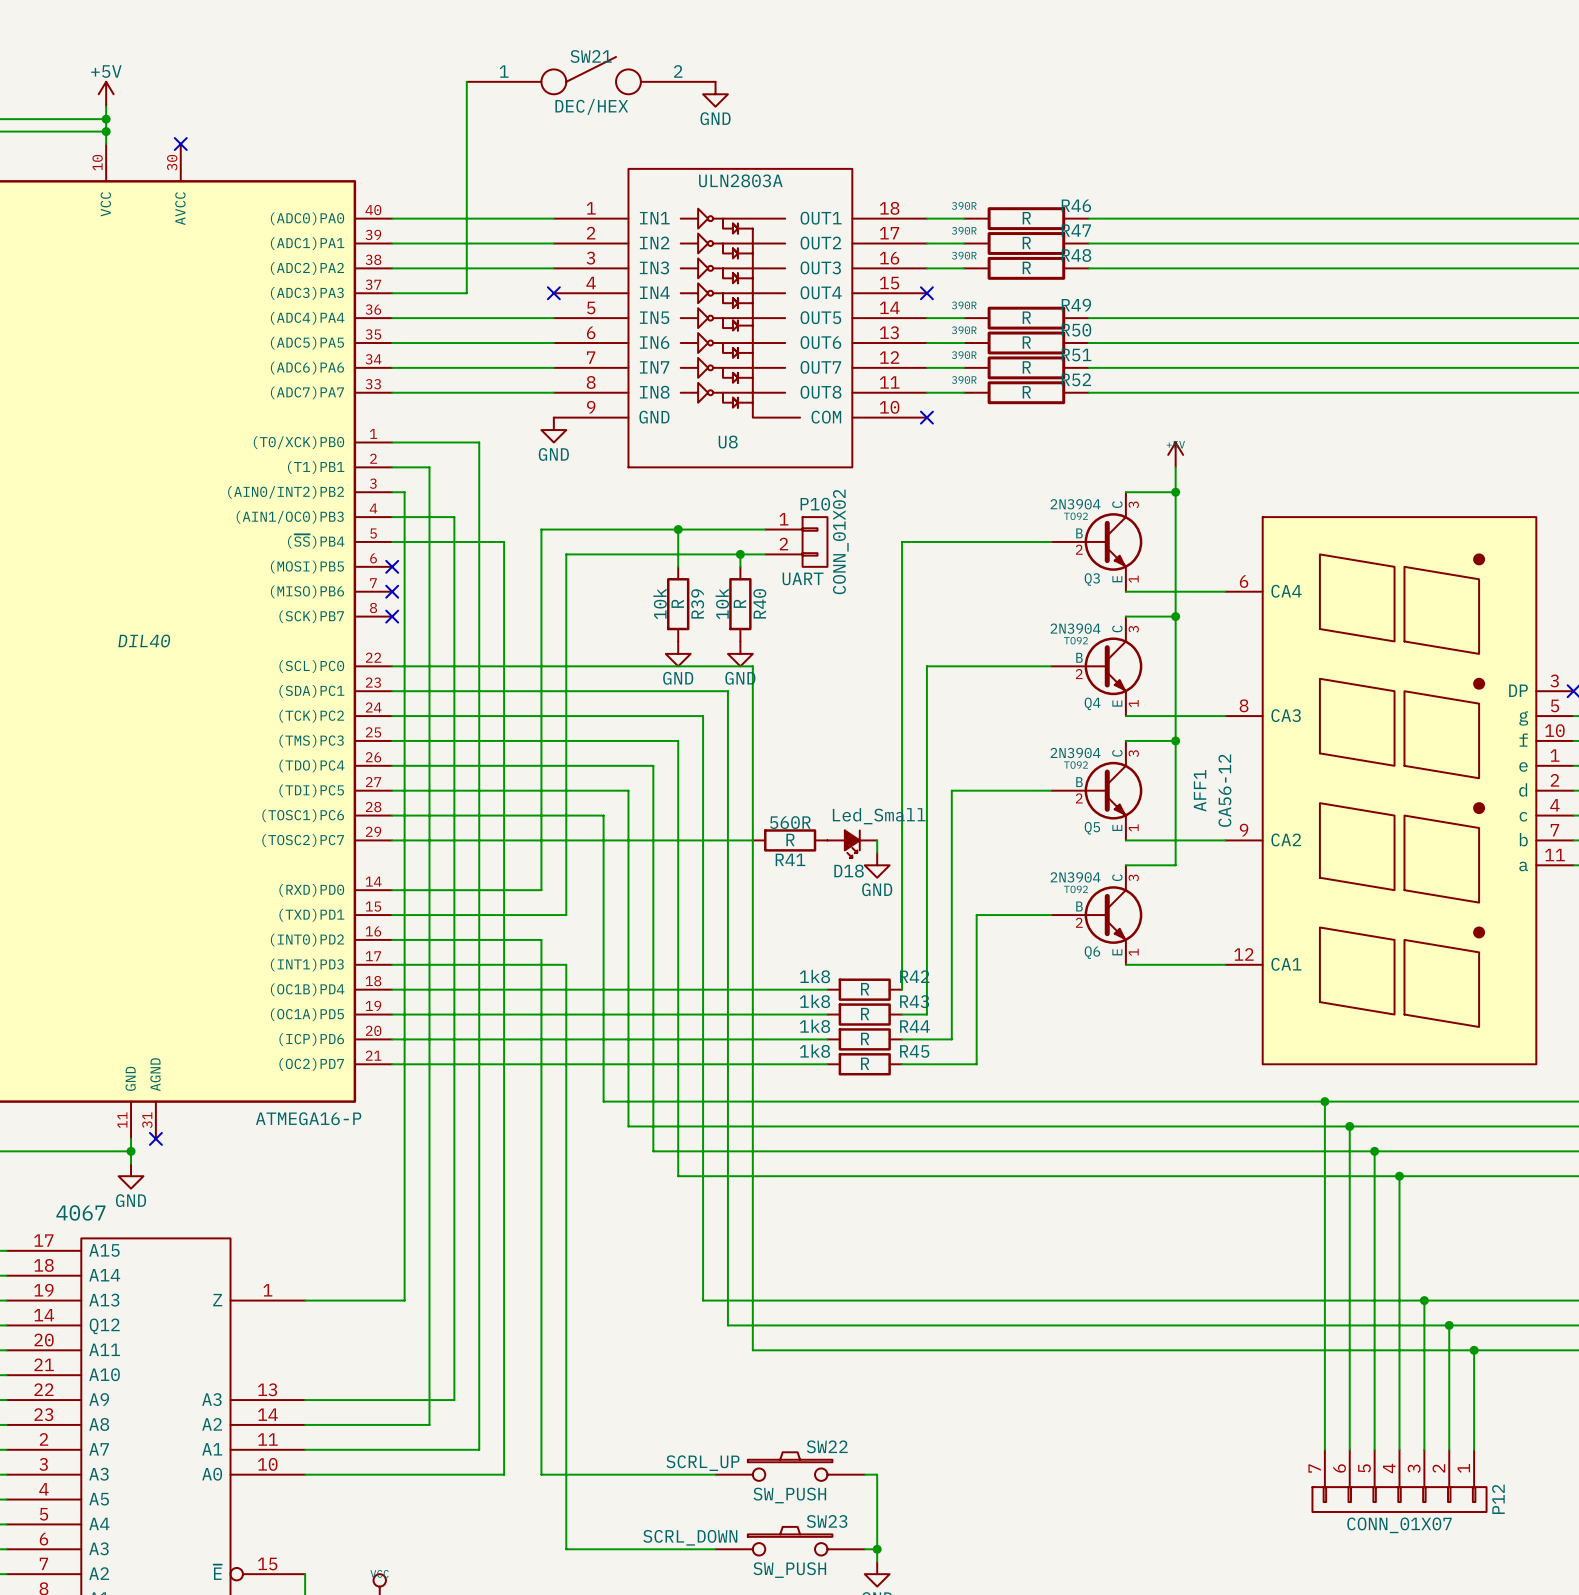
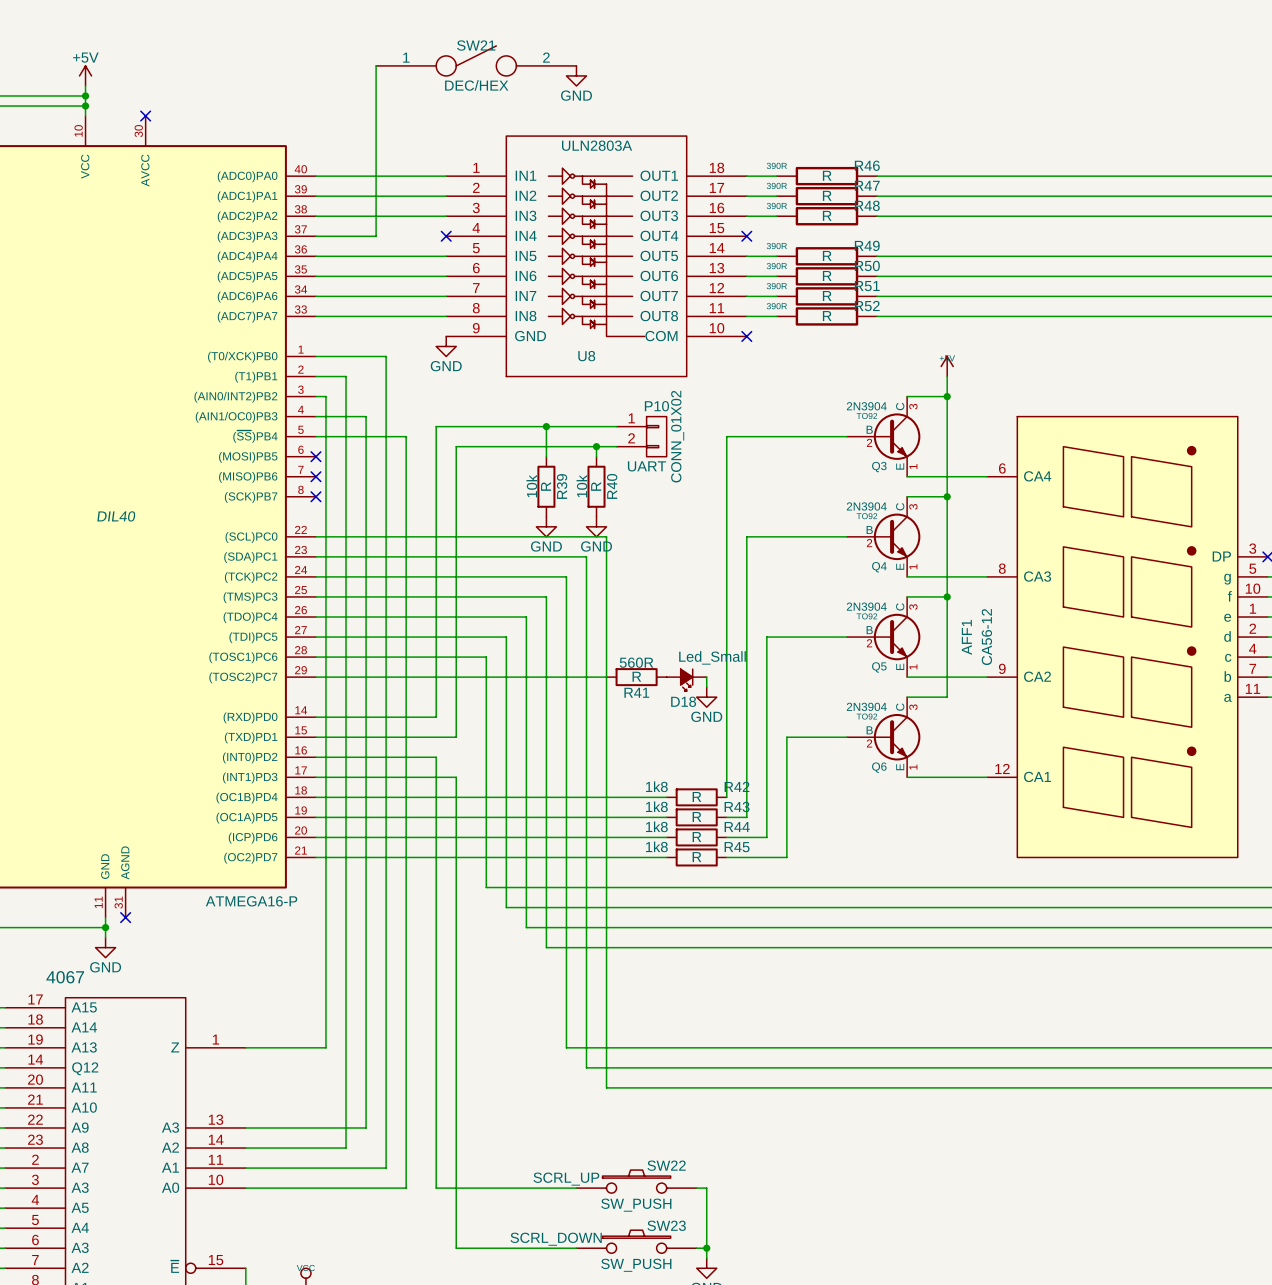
wire: (1324, 1101) (1324, 1449) -> none
junction: (1324, 1101) -> none
wire: (1349, 1126) (1349, 1449) -> none
junction: (1349, 1126) -> none
wire: (1374, 1151) (1374, 1449) -> none
junction: (1374, 1151) -> none
wire: (1399, 1176) (1399, 1449) -> none
junction: (1399, 1176) -> none
wire: (1424, 1300) (1424, 1449) -> none
junction: (1424, 1300) -> none
wire: (1449, 1325) (1449, 1449) -> none
junction: (1449, 1325) -> none
wire: (1474, 1350) (1474, 1449) -> none
junction: (1474, 1350) -> none
P12: CONN_01X07 (1399, 1480) -> none

